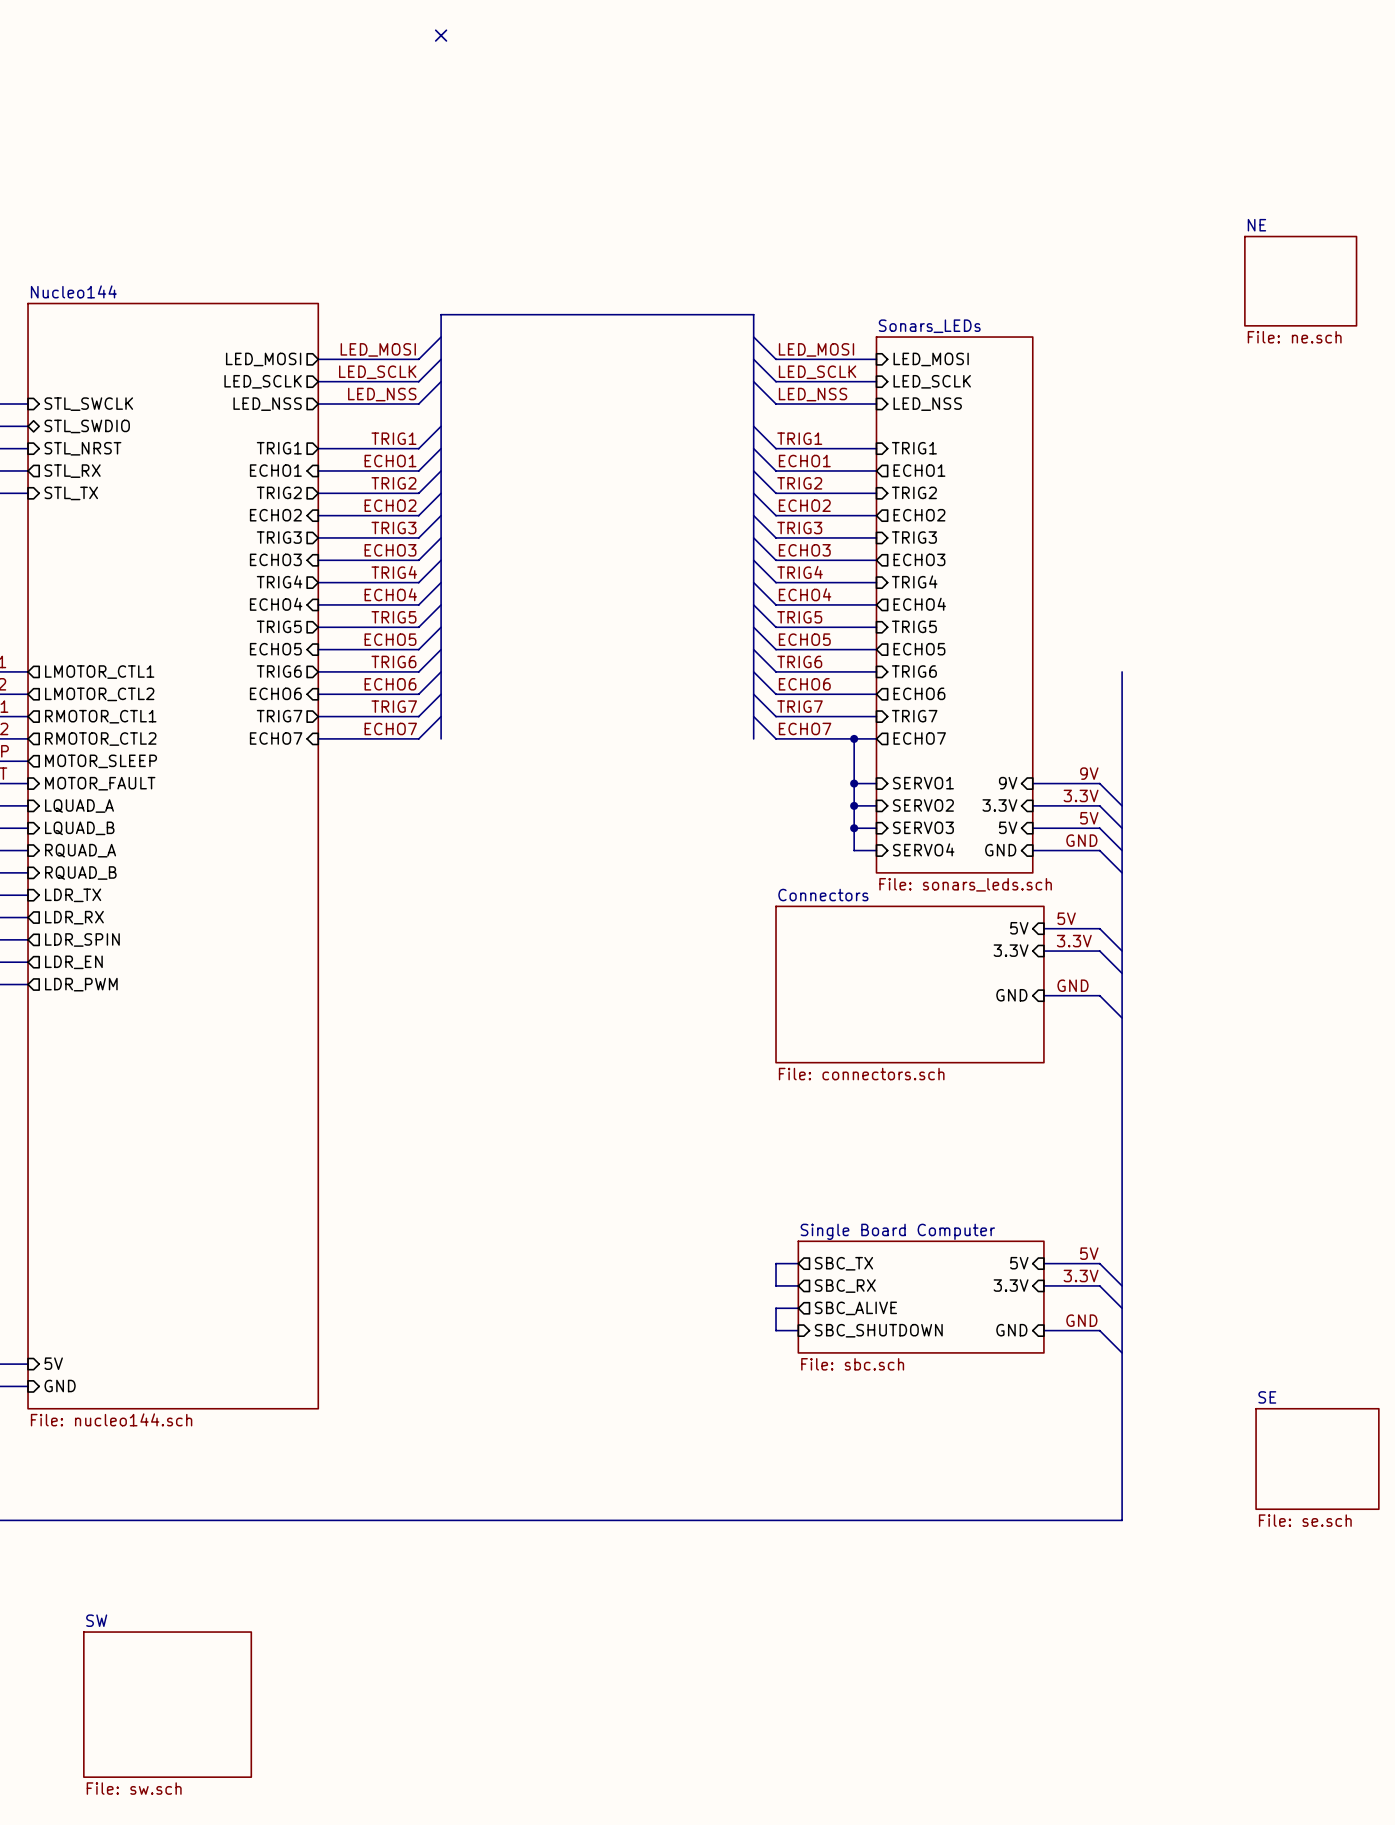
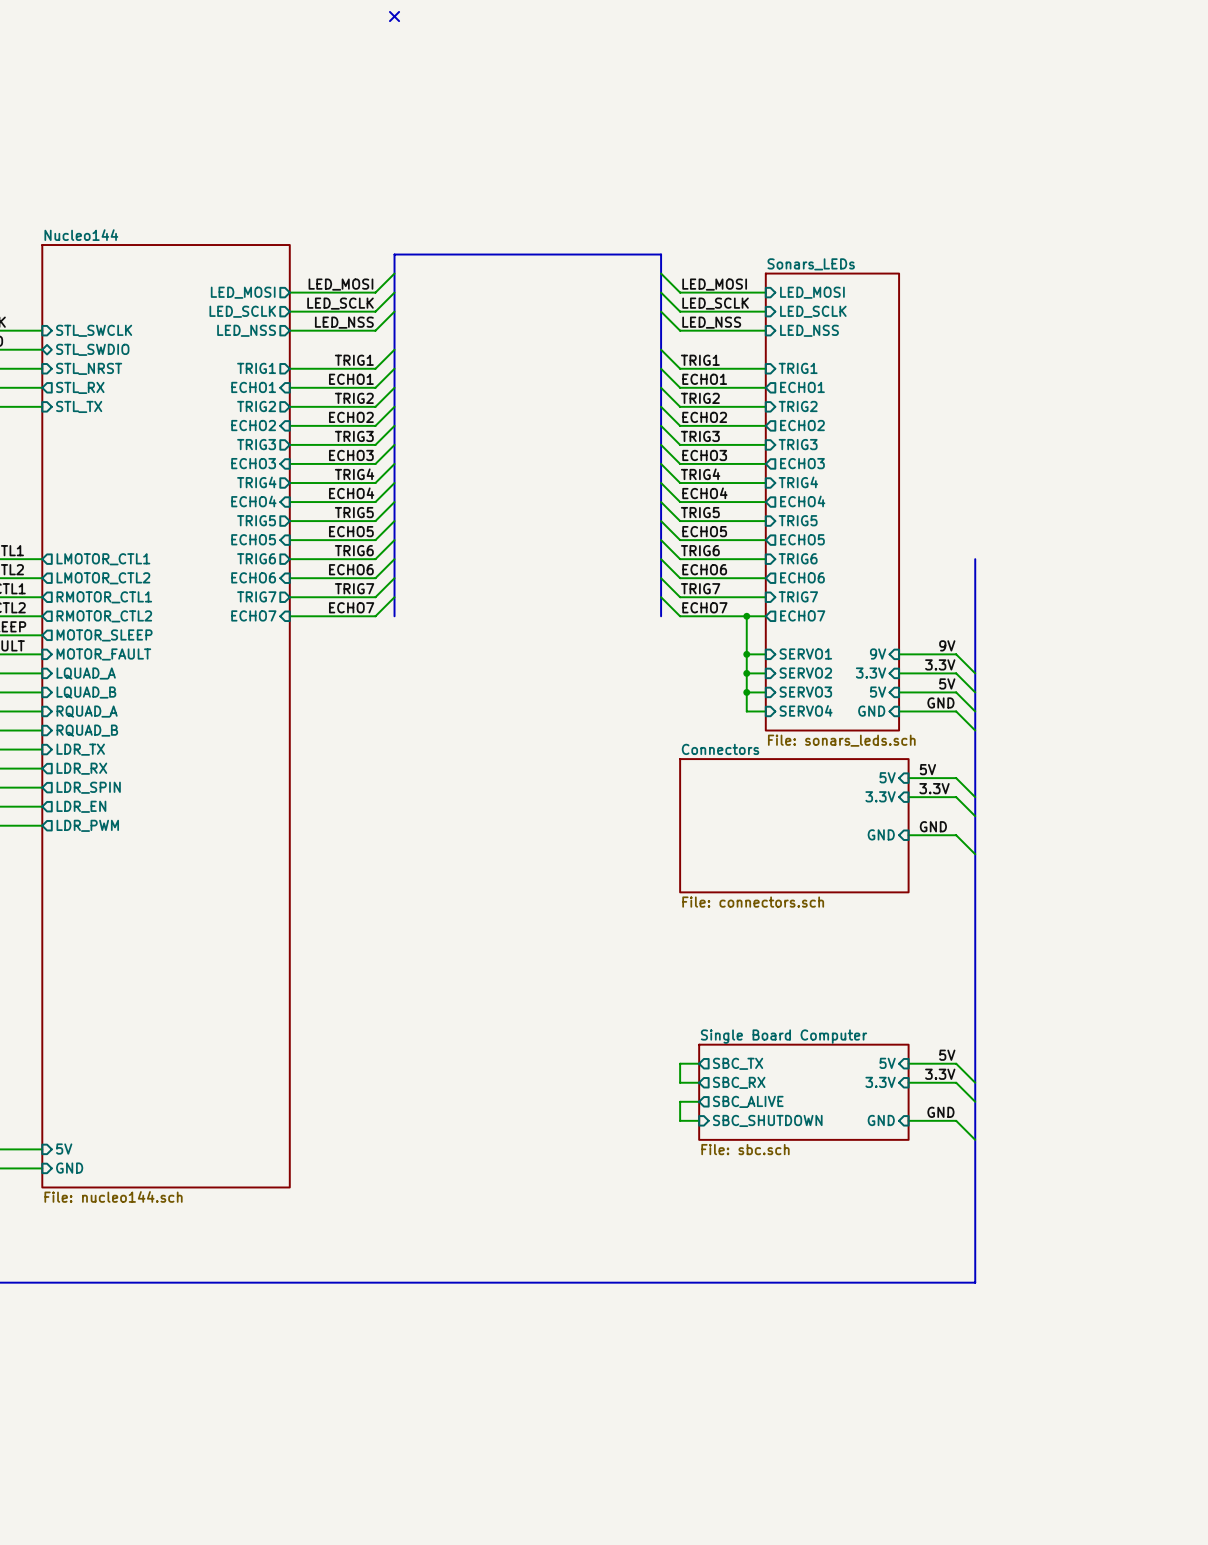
sheet NE: File: ne.sch (1300, 281) -> none
sheet SE: File: se.sch (1317, 1458) -> none
sheet SW: File: sw.sch (167, 1704) -> none

